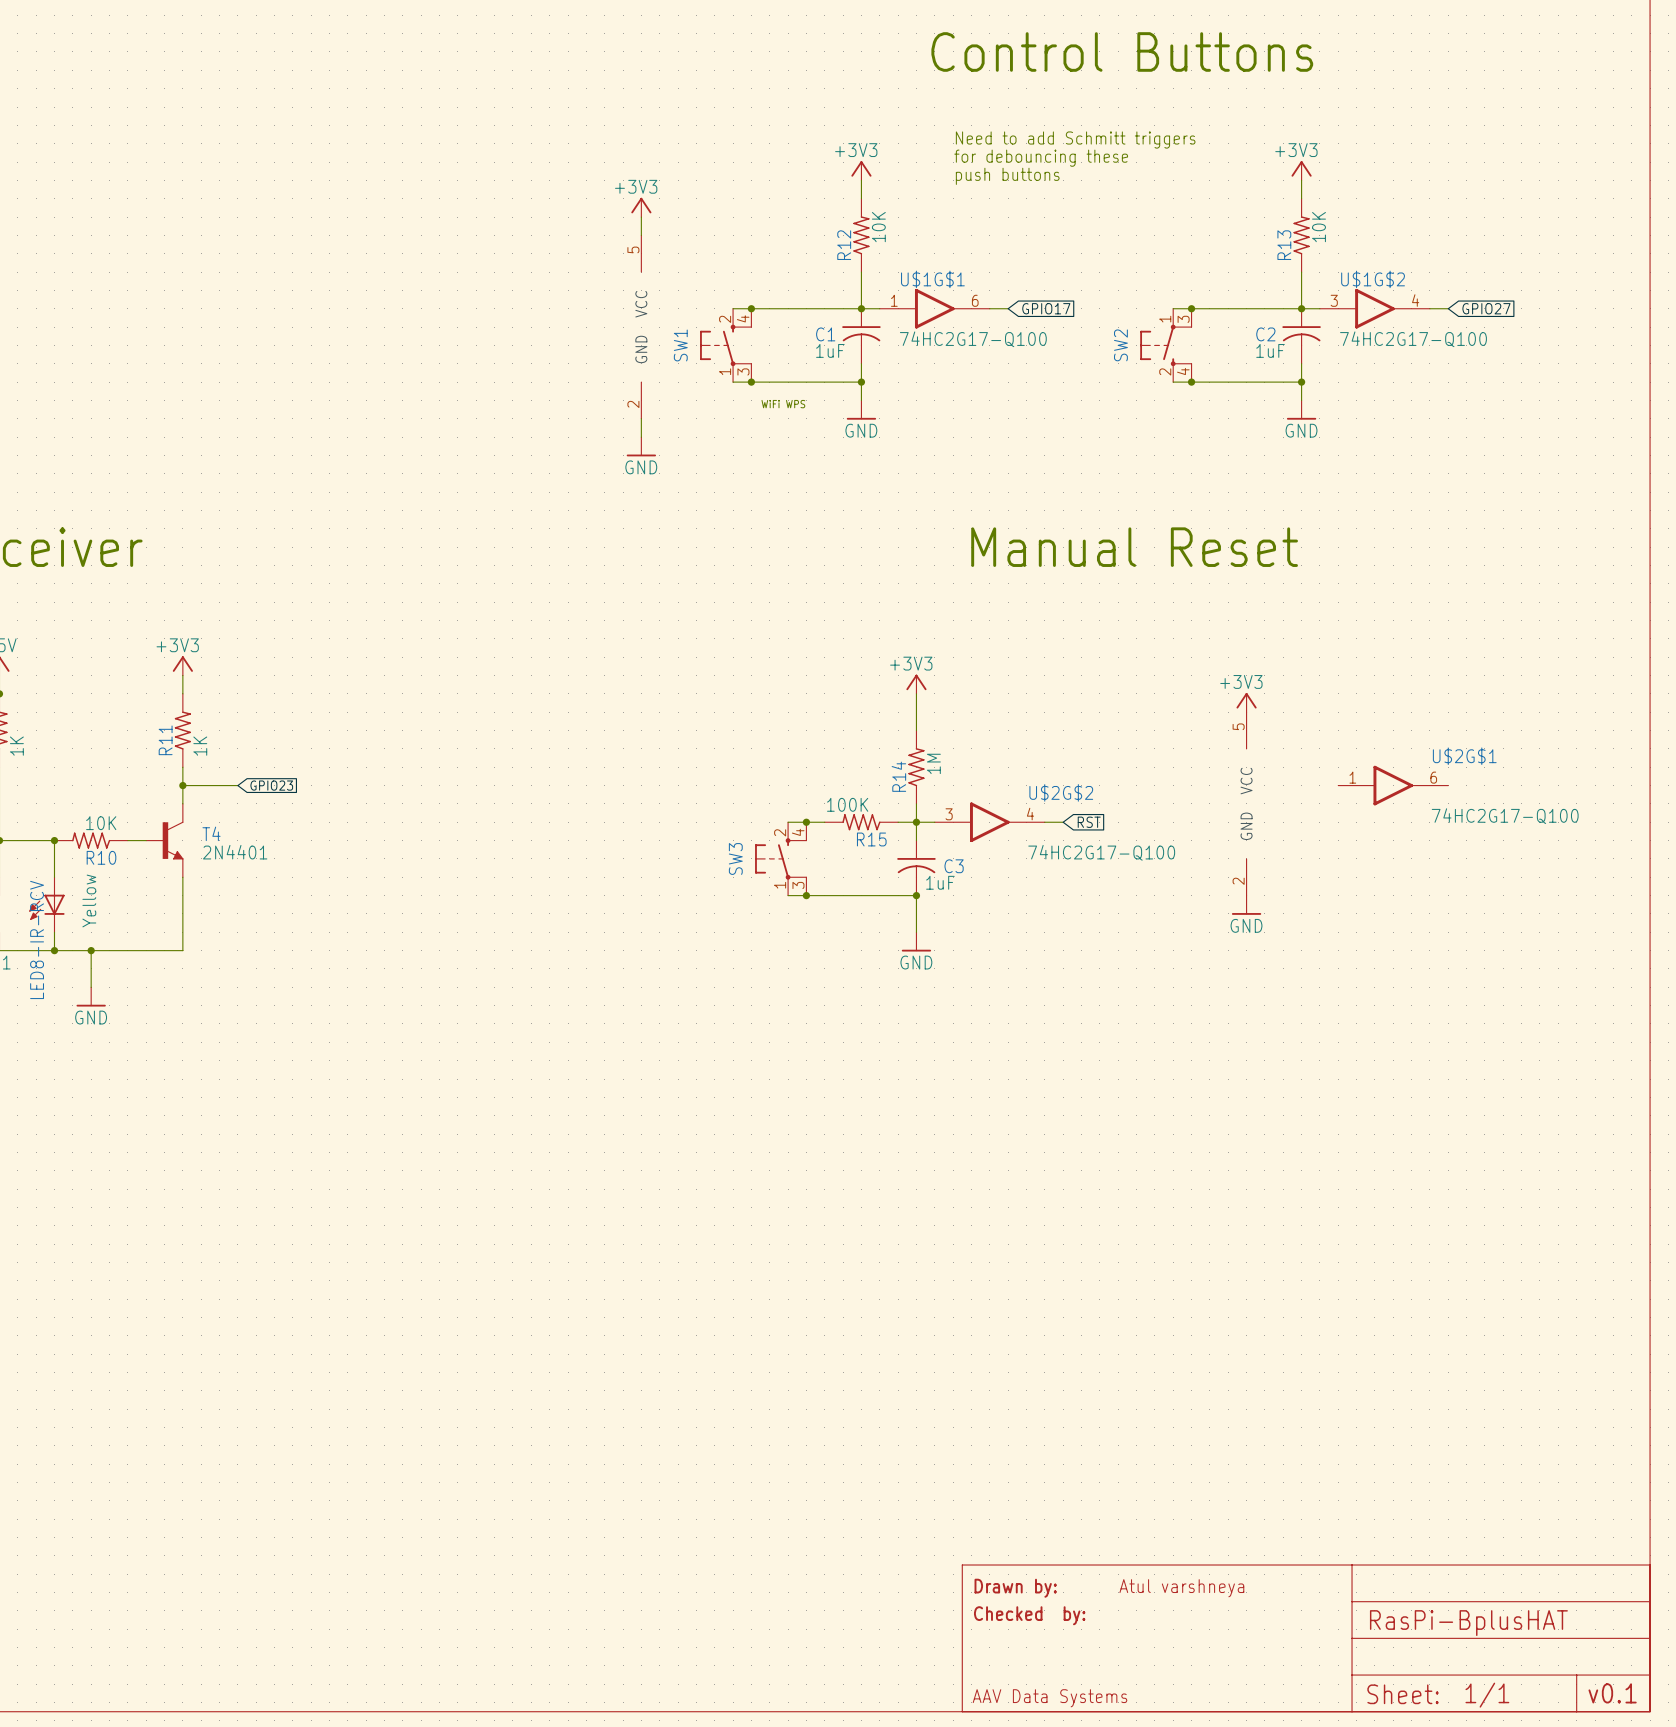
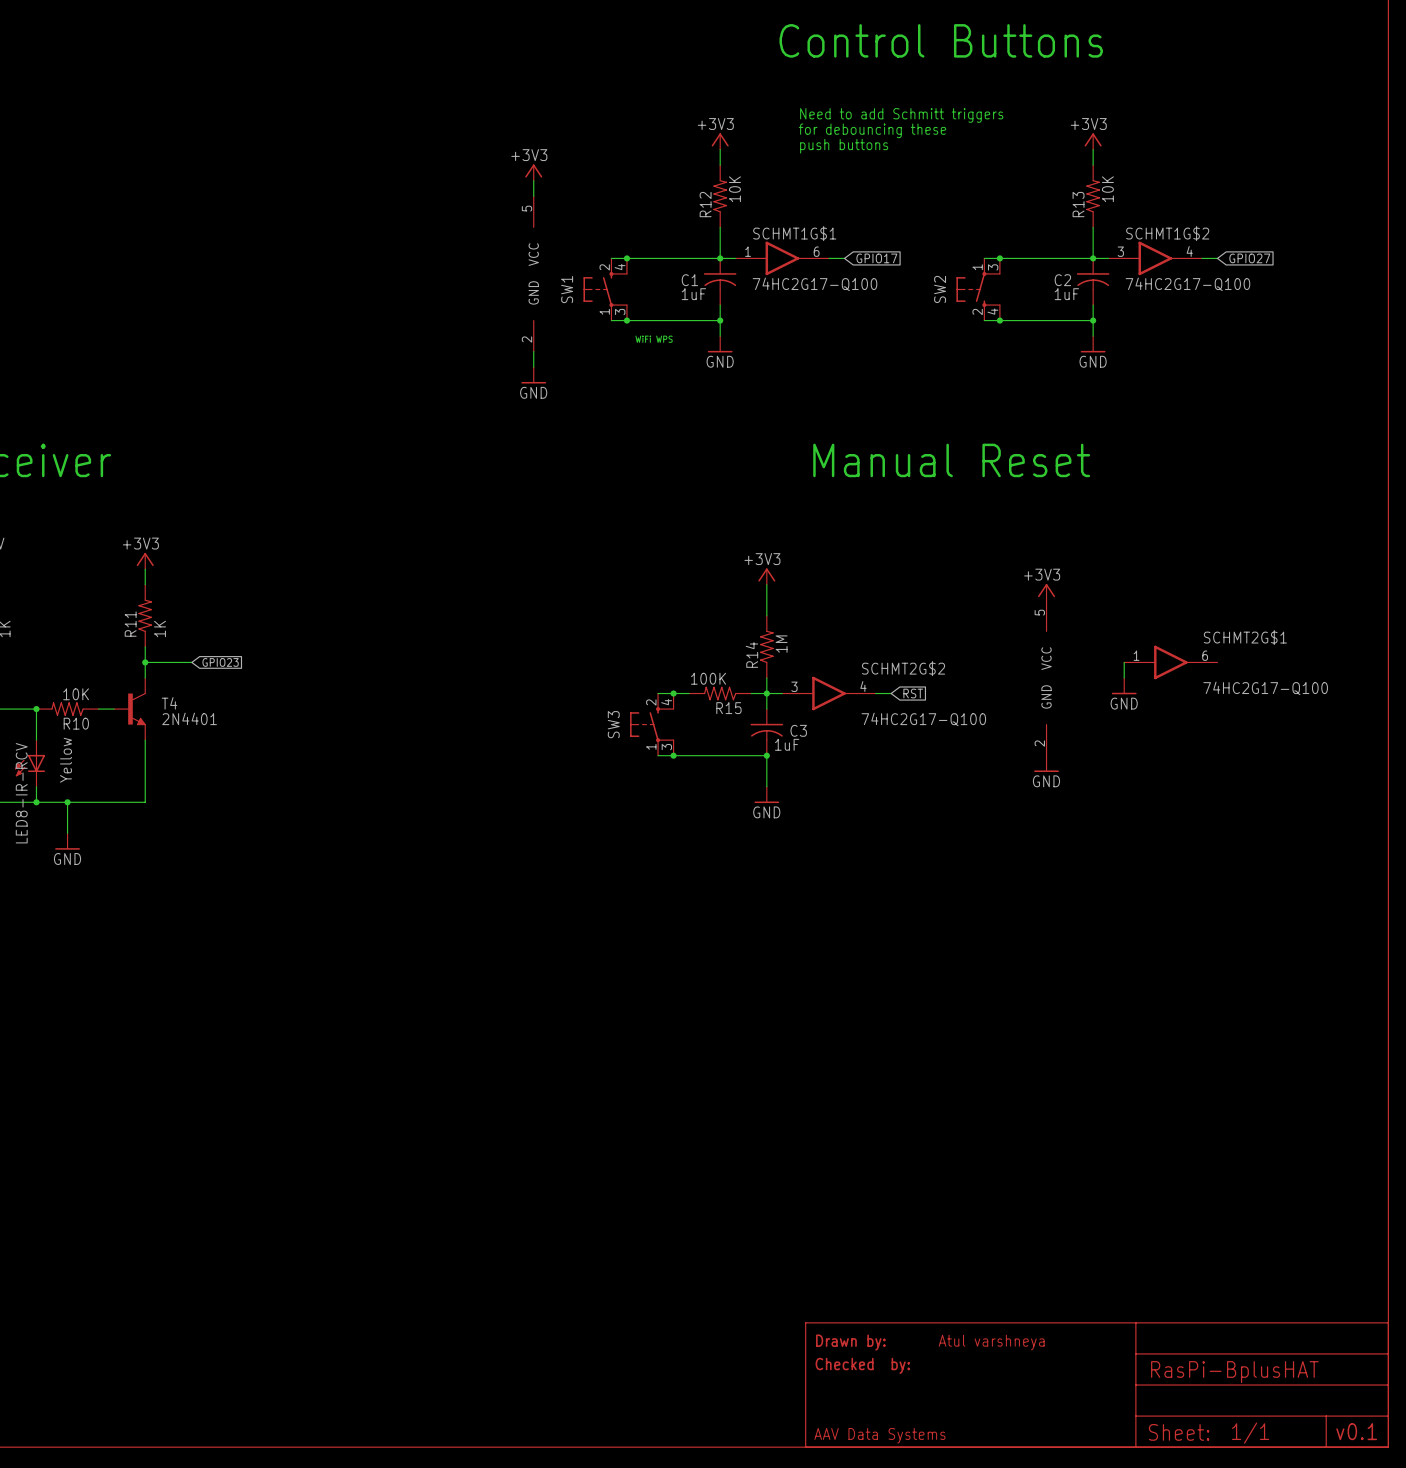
U$1G$1 name: U$1G$1 (932, 279) -> SCHMT1G$1 (794, 233)
U$1G$2 name: U$1G$2 (1373, 279) -> SCHMT1G$2 (1167, 233)
U$2G$1 name: U$2G$1 (1464, 756) -> SCHMT2G$1 (1245, 637)
wire: none -> (1124, 662) (1124, 677)
U$2G$2 name: U$2G$2 (1061, 792) -> SCHMT2G$2 (903, 668)
power symbol: none -> GND (1124, 686)

